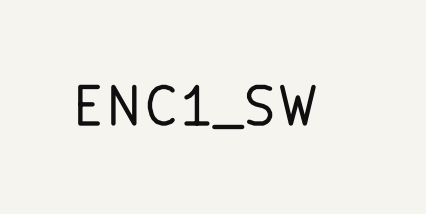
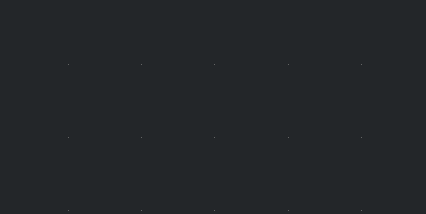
label: ENC1_SW (196, 106) -> none

